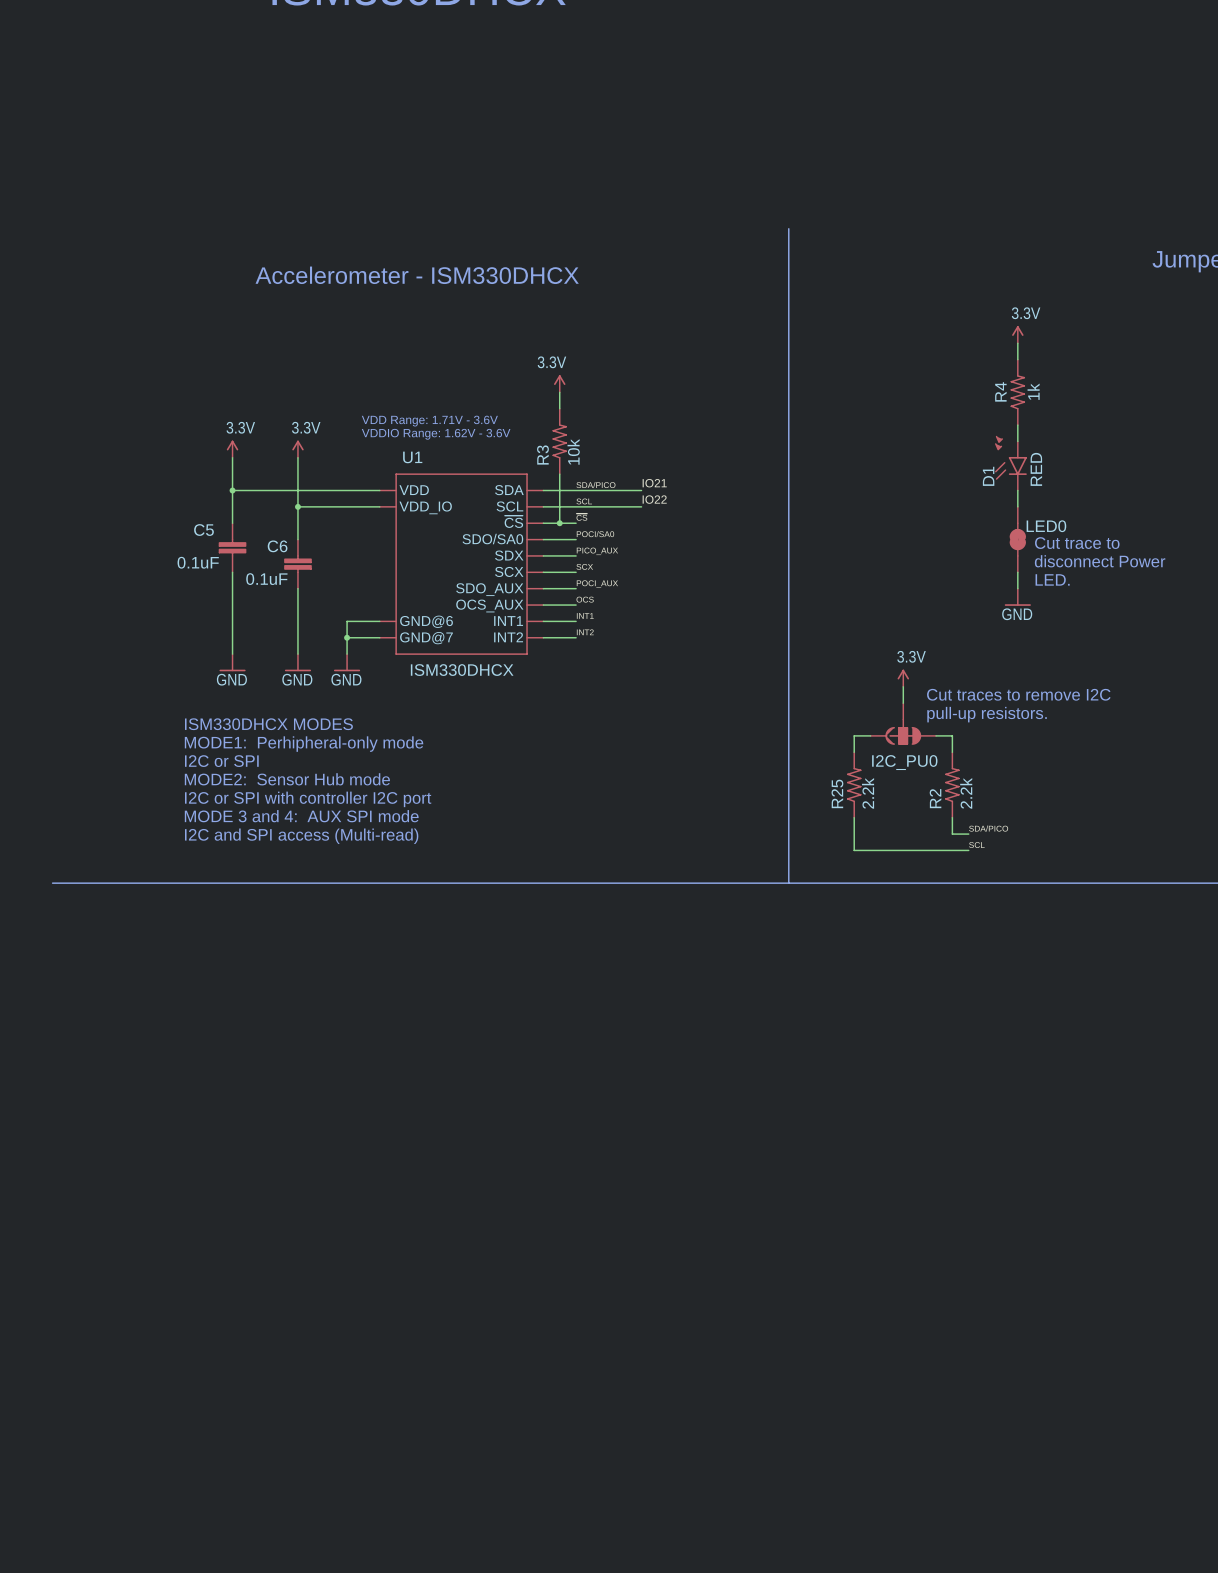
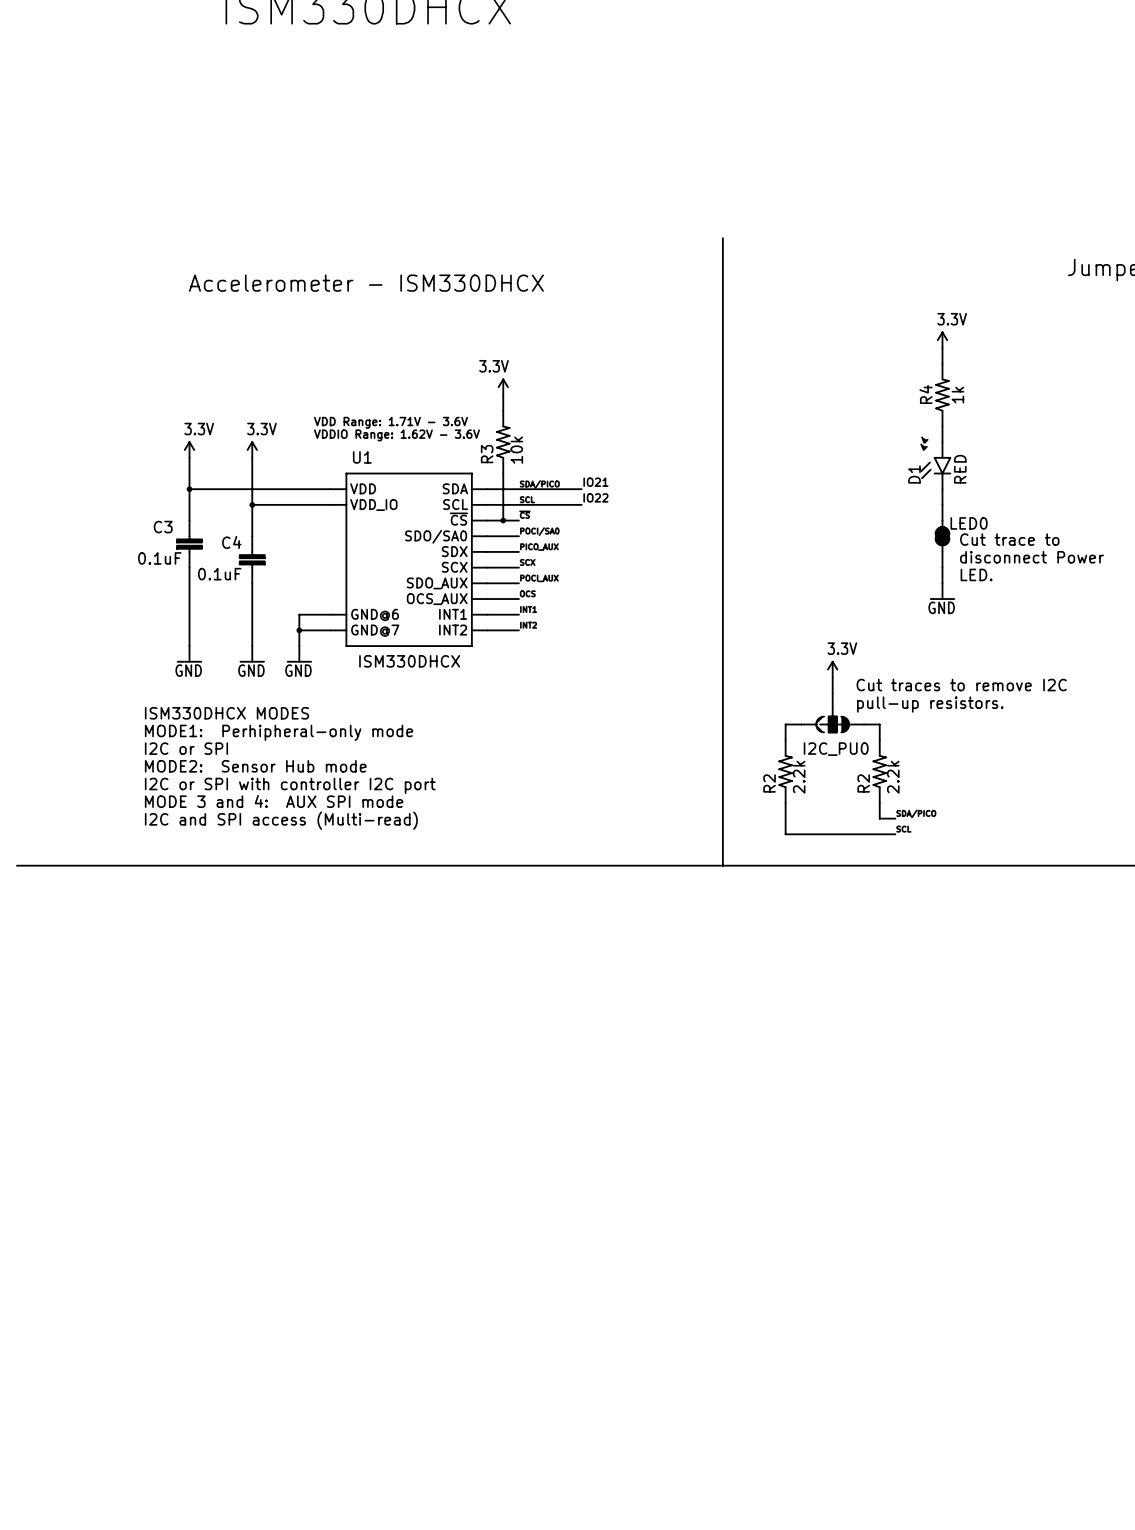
C5 name: C5 (203, 530) -> C3 (163, 527)
C6 name: C6 (277, 546) -> C4 (231, 542)
R25 name: R25 (837, 793) -> R2 (769, 783)

